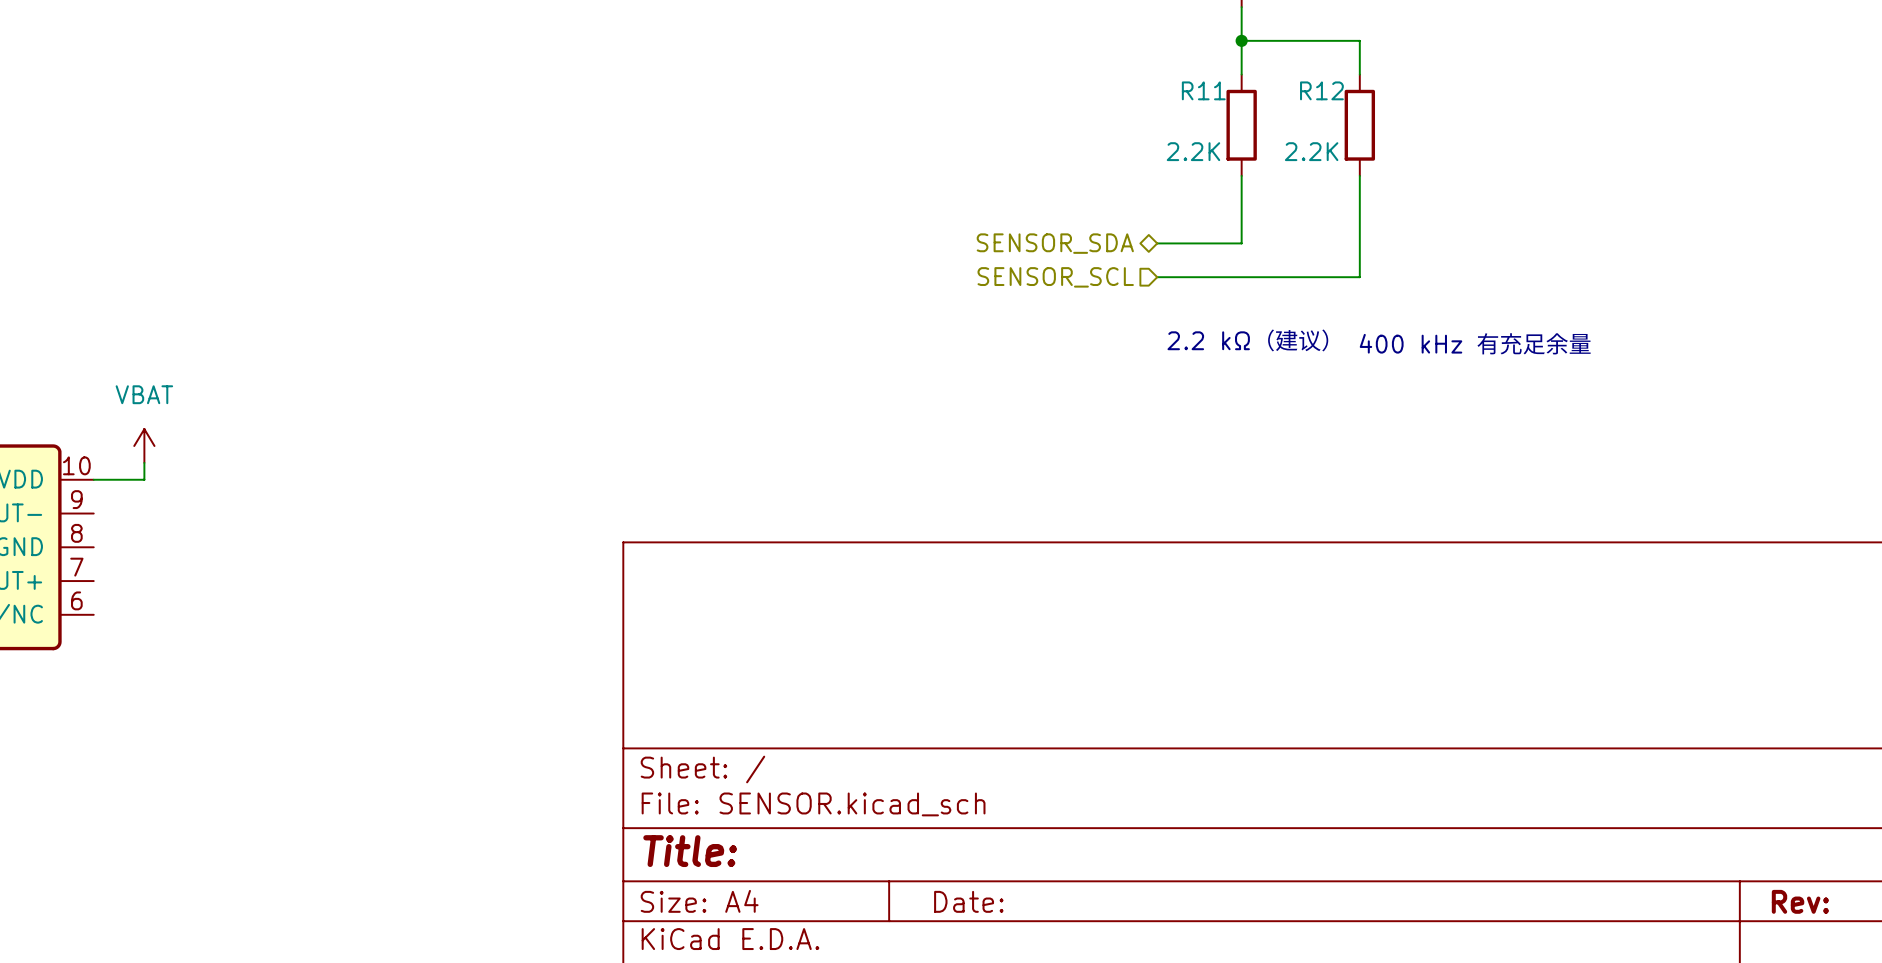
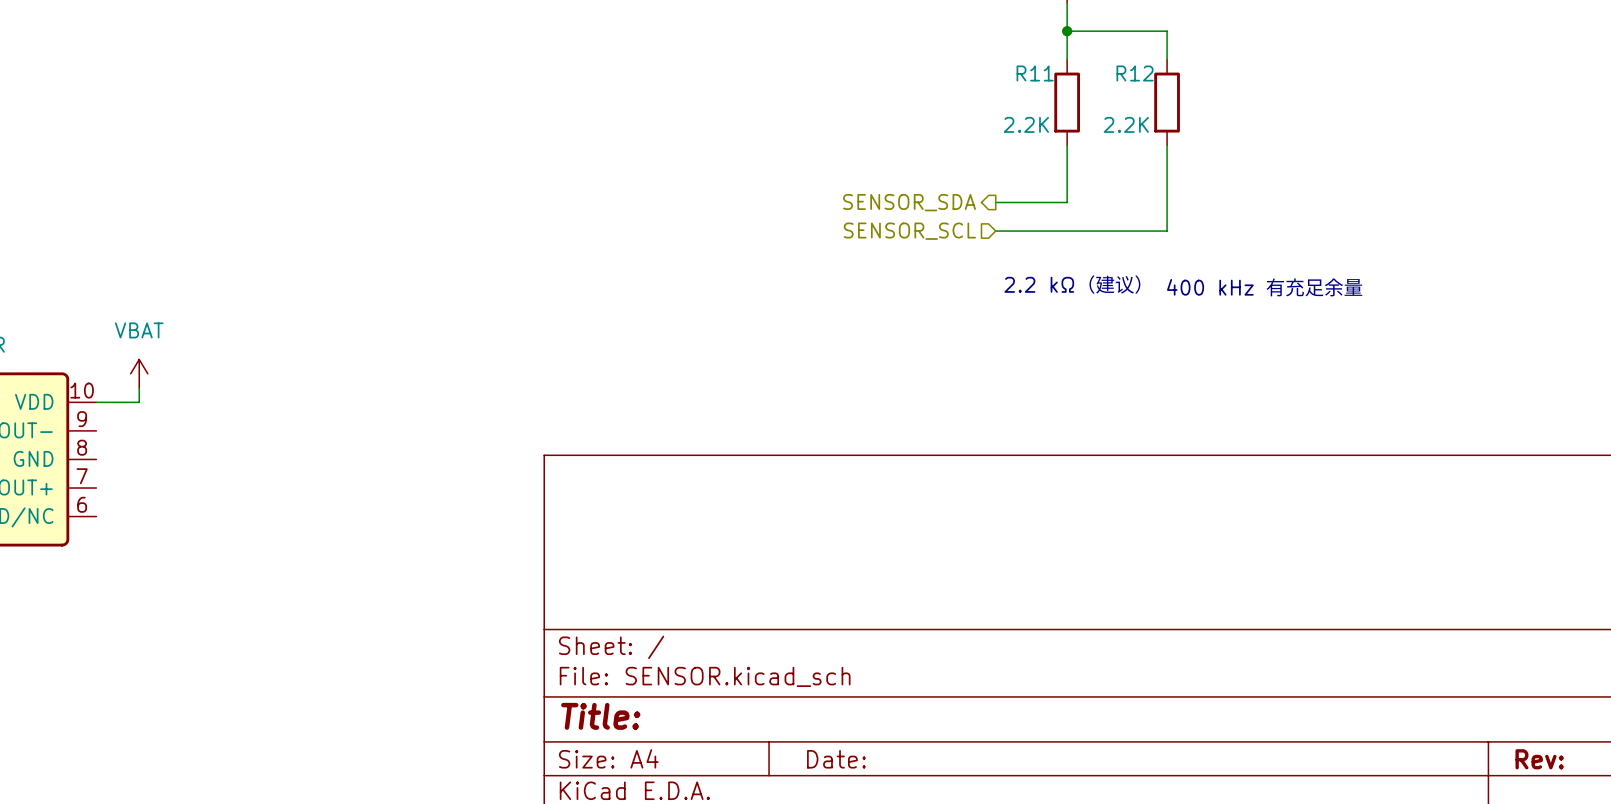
hierarchical label shape: bidirectional (1055, 243) -> output (909, 202)

